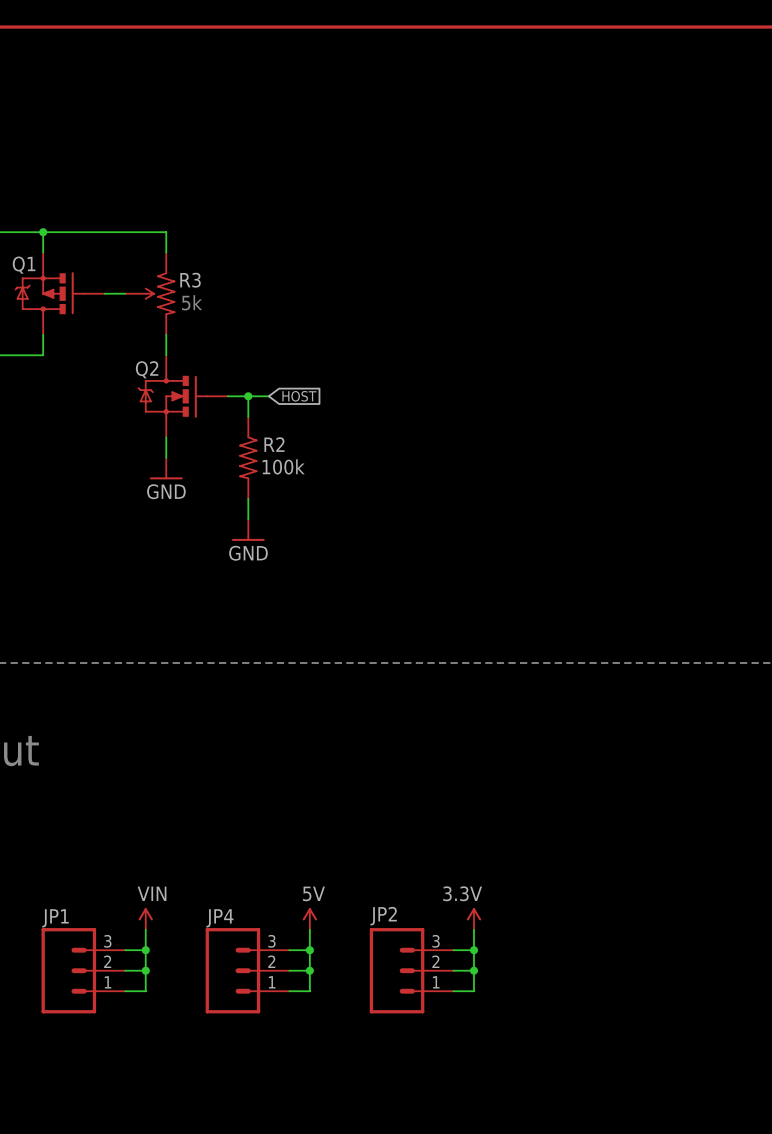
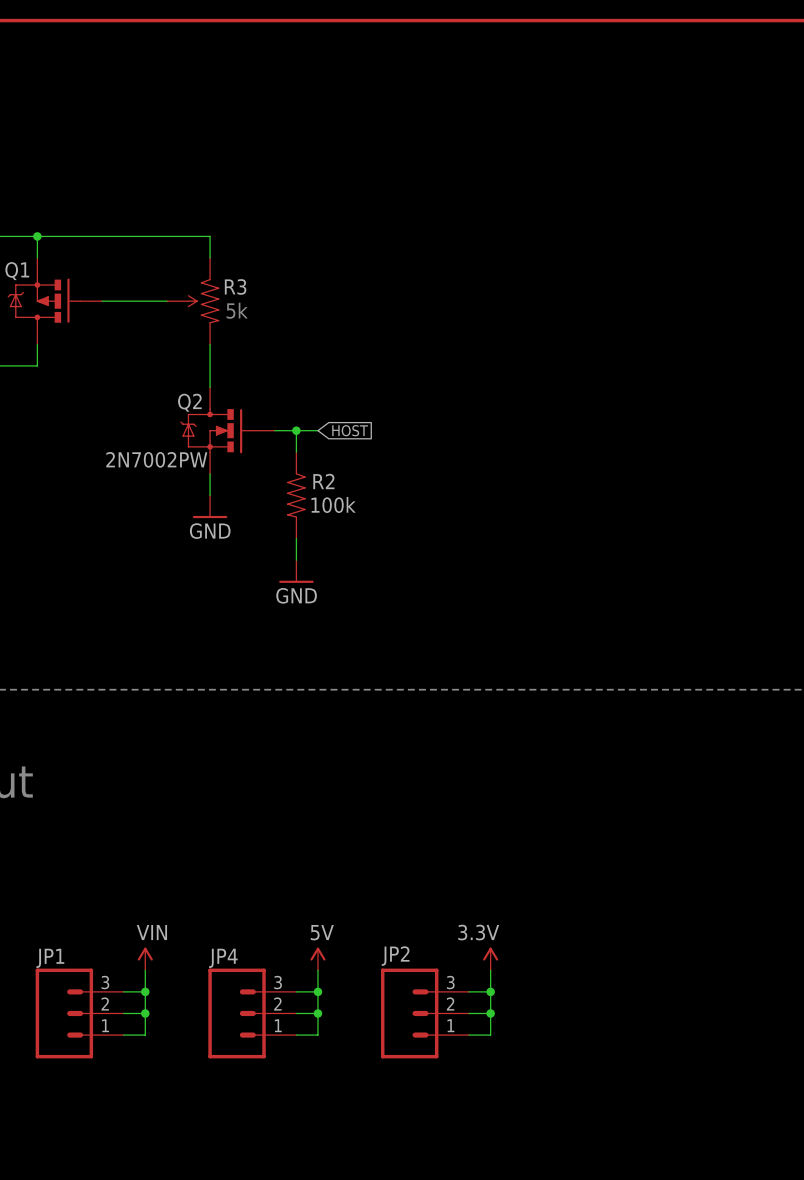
wire: (166, 232) (166, 252) -> (166, 236) (210, 236) (210, 258)
R3 position: (150, 293) -> (193, 301)
text position: 5k (192, 302) -> 5k (237, 310)
wire: (166, 334) (166, 355) -> none
wire: none -> (210, 344) (210, 387)
Q2 position: (182, 396) -> (227, 430)
wire: (227, 396) (268, 396) -> (274, 430) (317, 430)
wire: (248, 396) (248, 416) -> (296, 430) (296, 452)
junction position: (248, 396) -> (296, 430)
global label position: HOST (299, 396) -> HOST (350, 430)
wire: (166, 437) (166, 457) -> (210, 473) (210, 495)
text: none -> 2N7002PW (156, 459)
R2 position: (248, 457) -> (296, 495)
power symbol: GND (166, 468) -> none
power symbol: none -> GND (210, 506)
wire: (248, 498) (248, 519) -> (296, 538) (296, 560)
power symbol: GND (248, 530) -> none
power symbol: none -> GND (296, 571)

